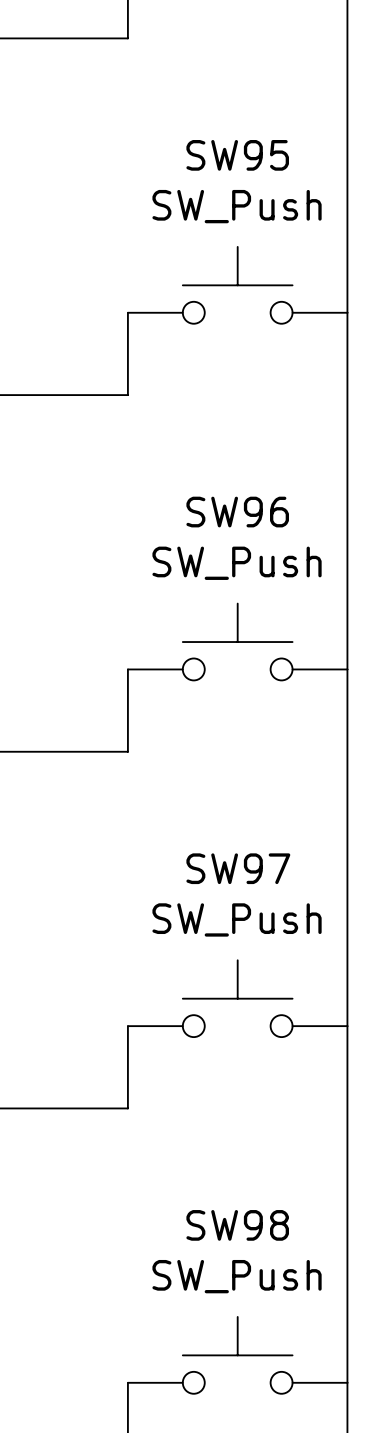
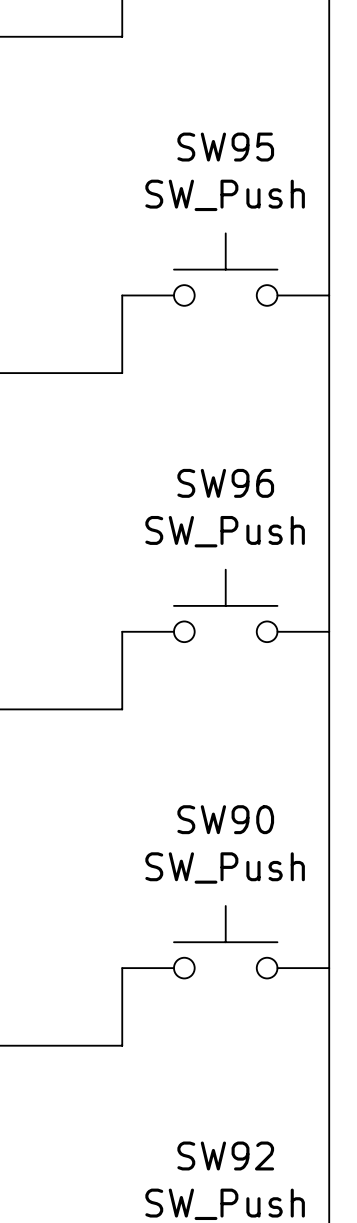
SW97 name: SW97 (238, 868) -> SW90 (225, 819)
SW98 name: SW98 (237, 1225) -> SW92 (225, 1155)

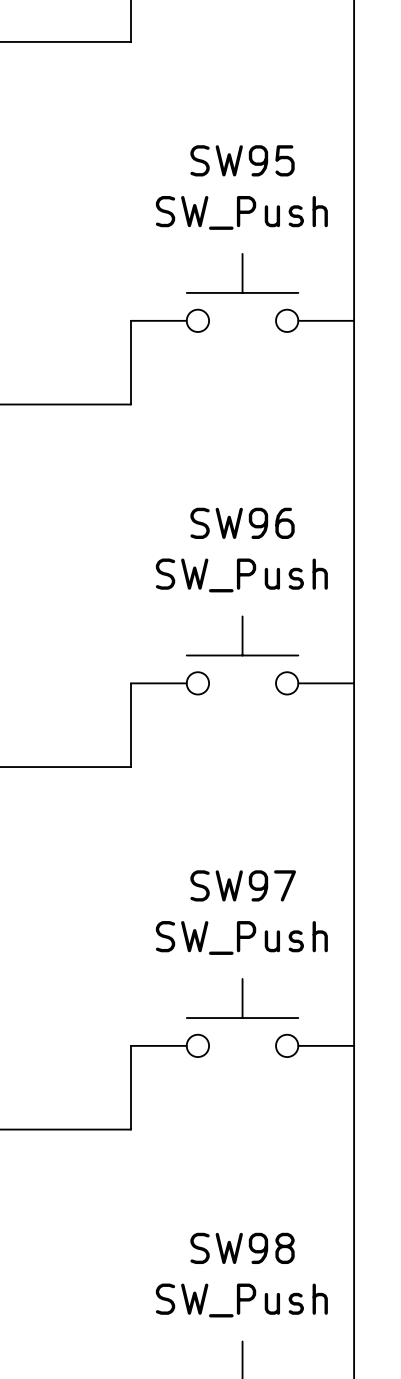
SW90 name: SW90 (225, 819) -> SW97 (243, 885)
SW92 name: SW92 (225, 1155) -> SW98 (242, 1248)

